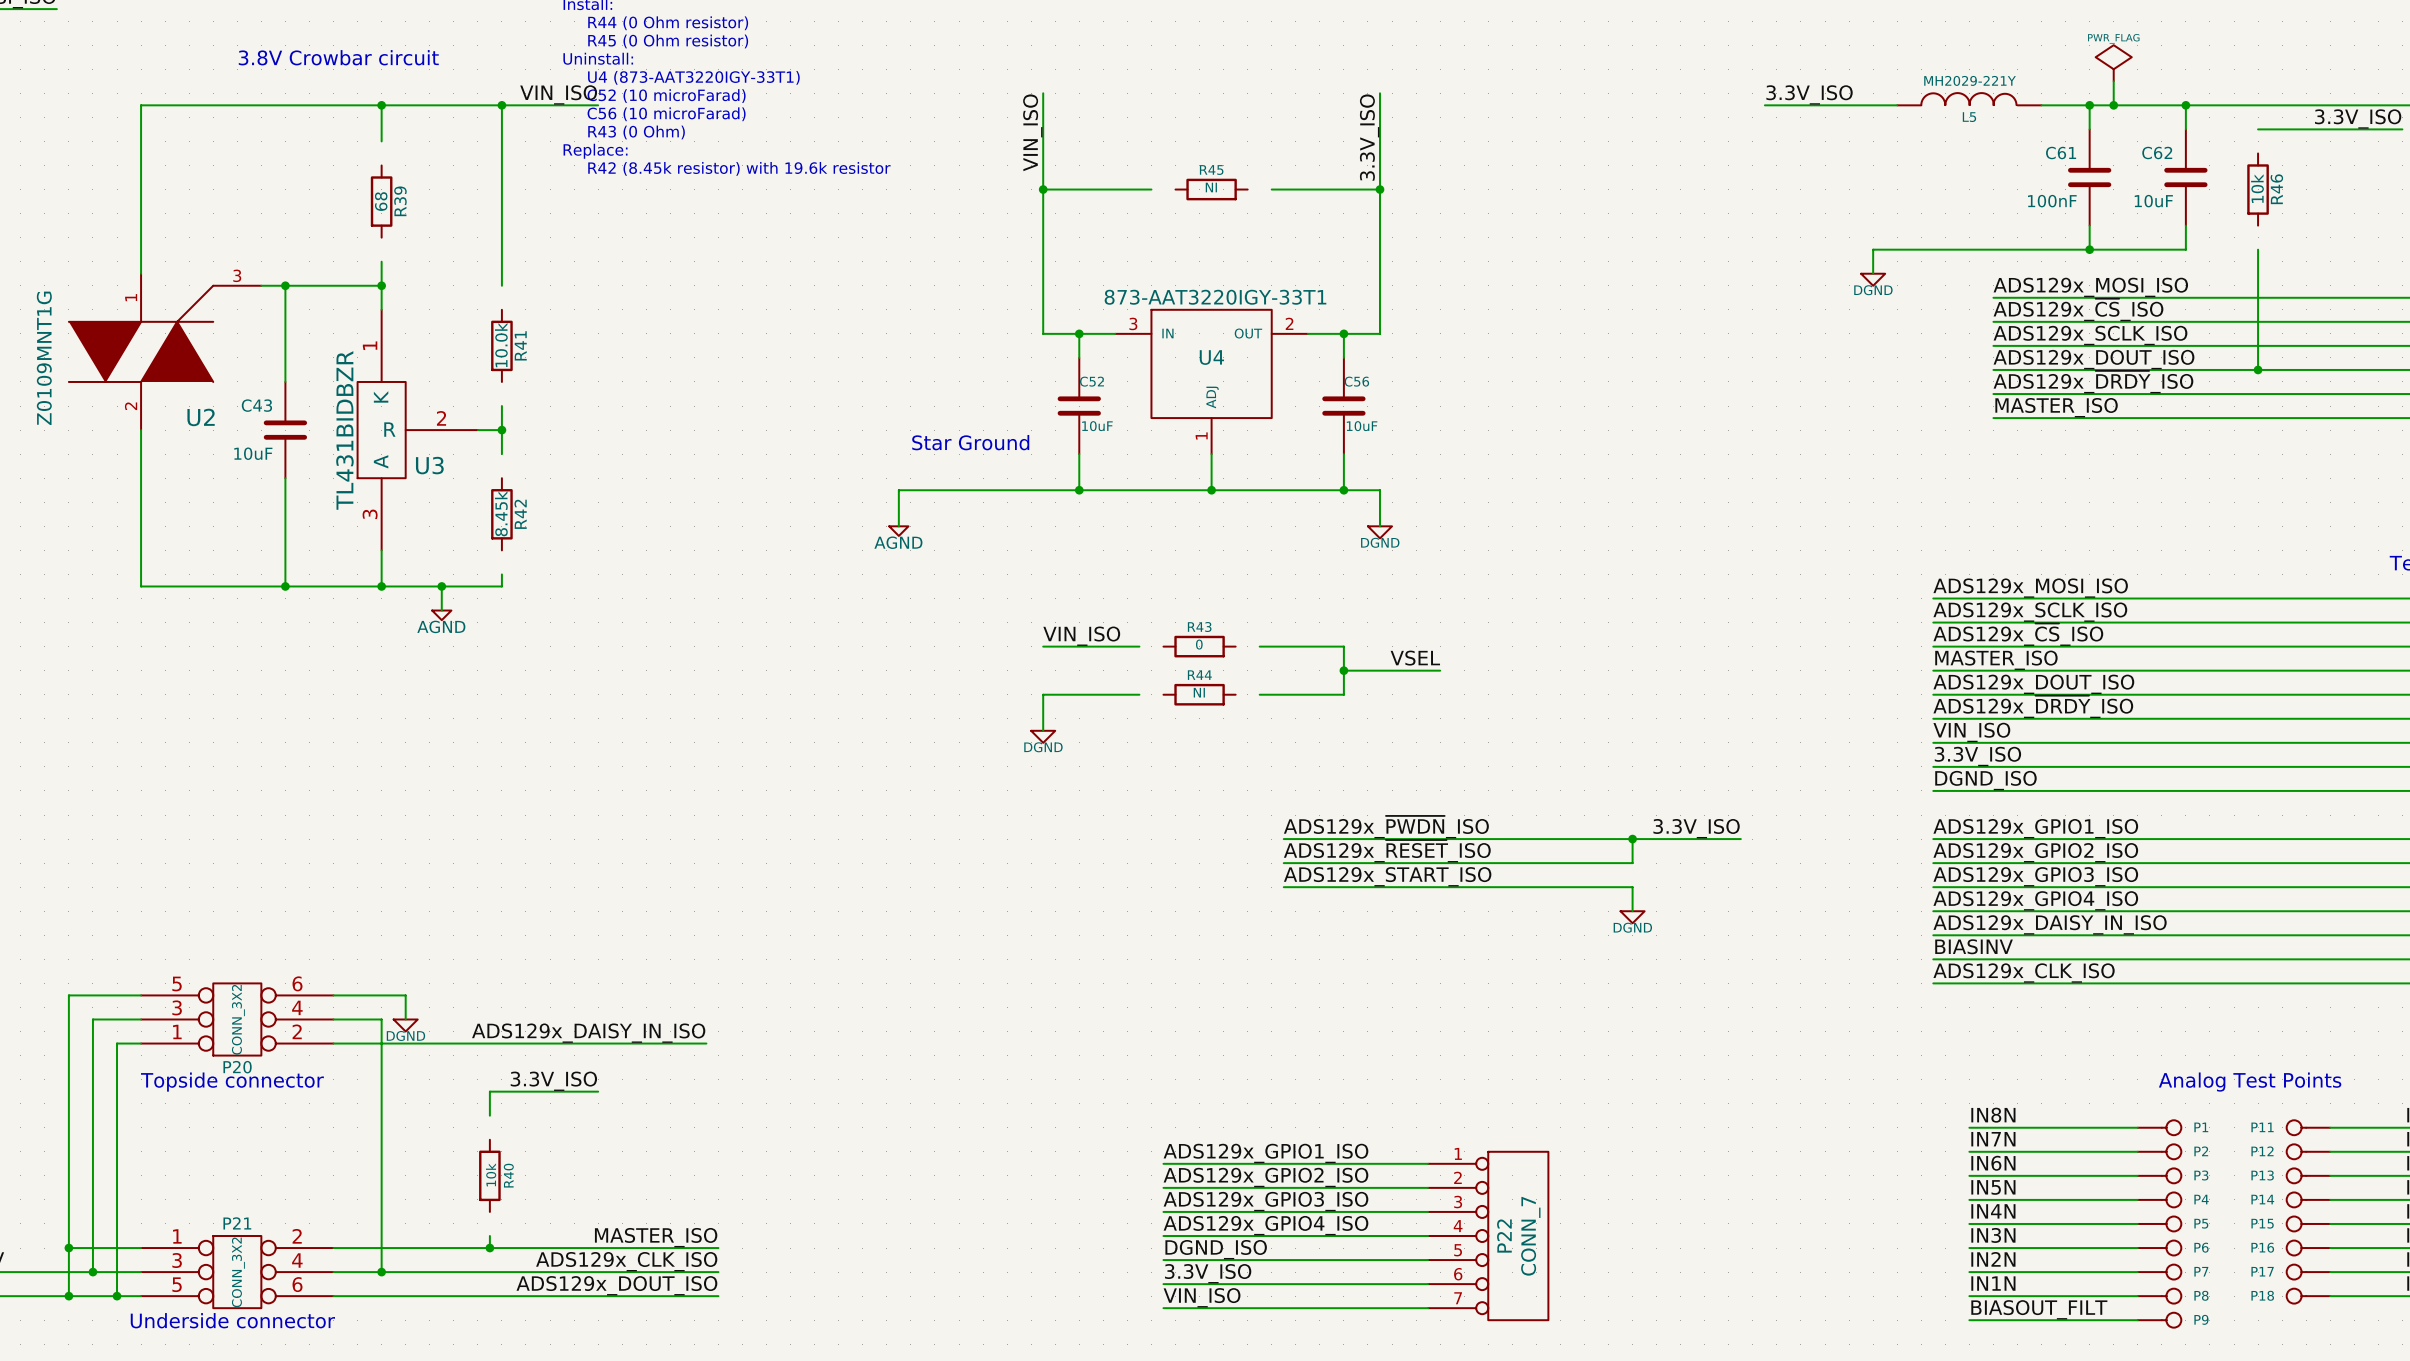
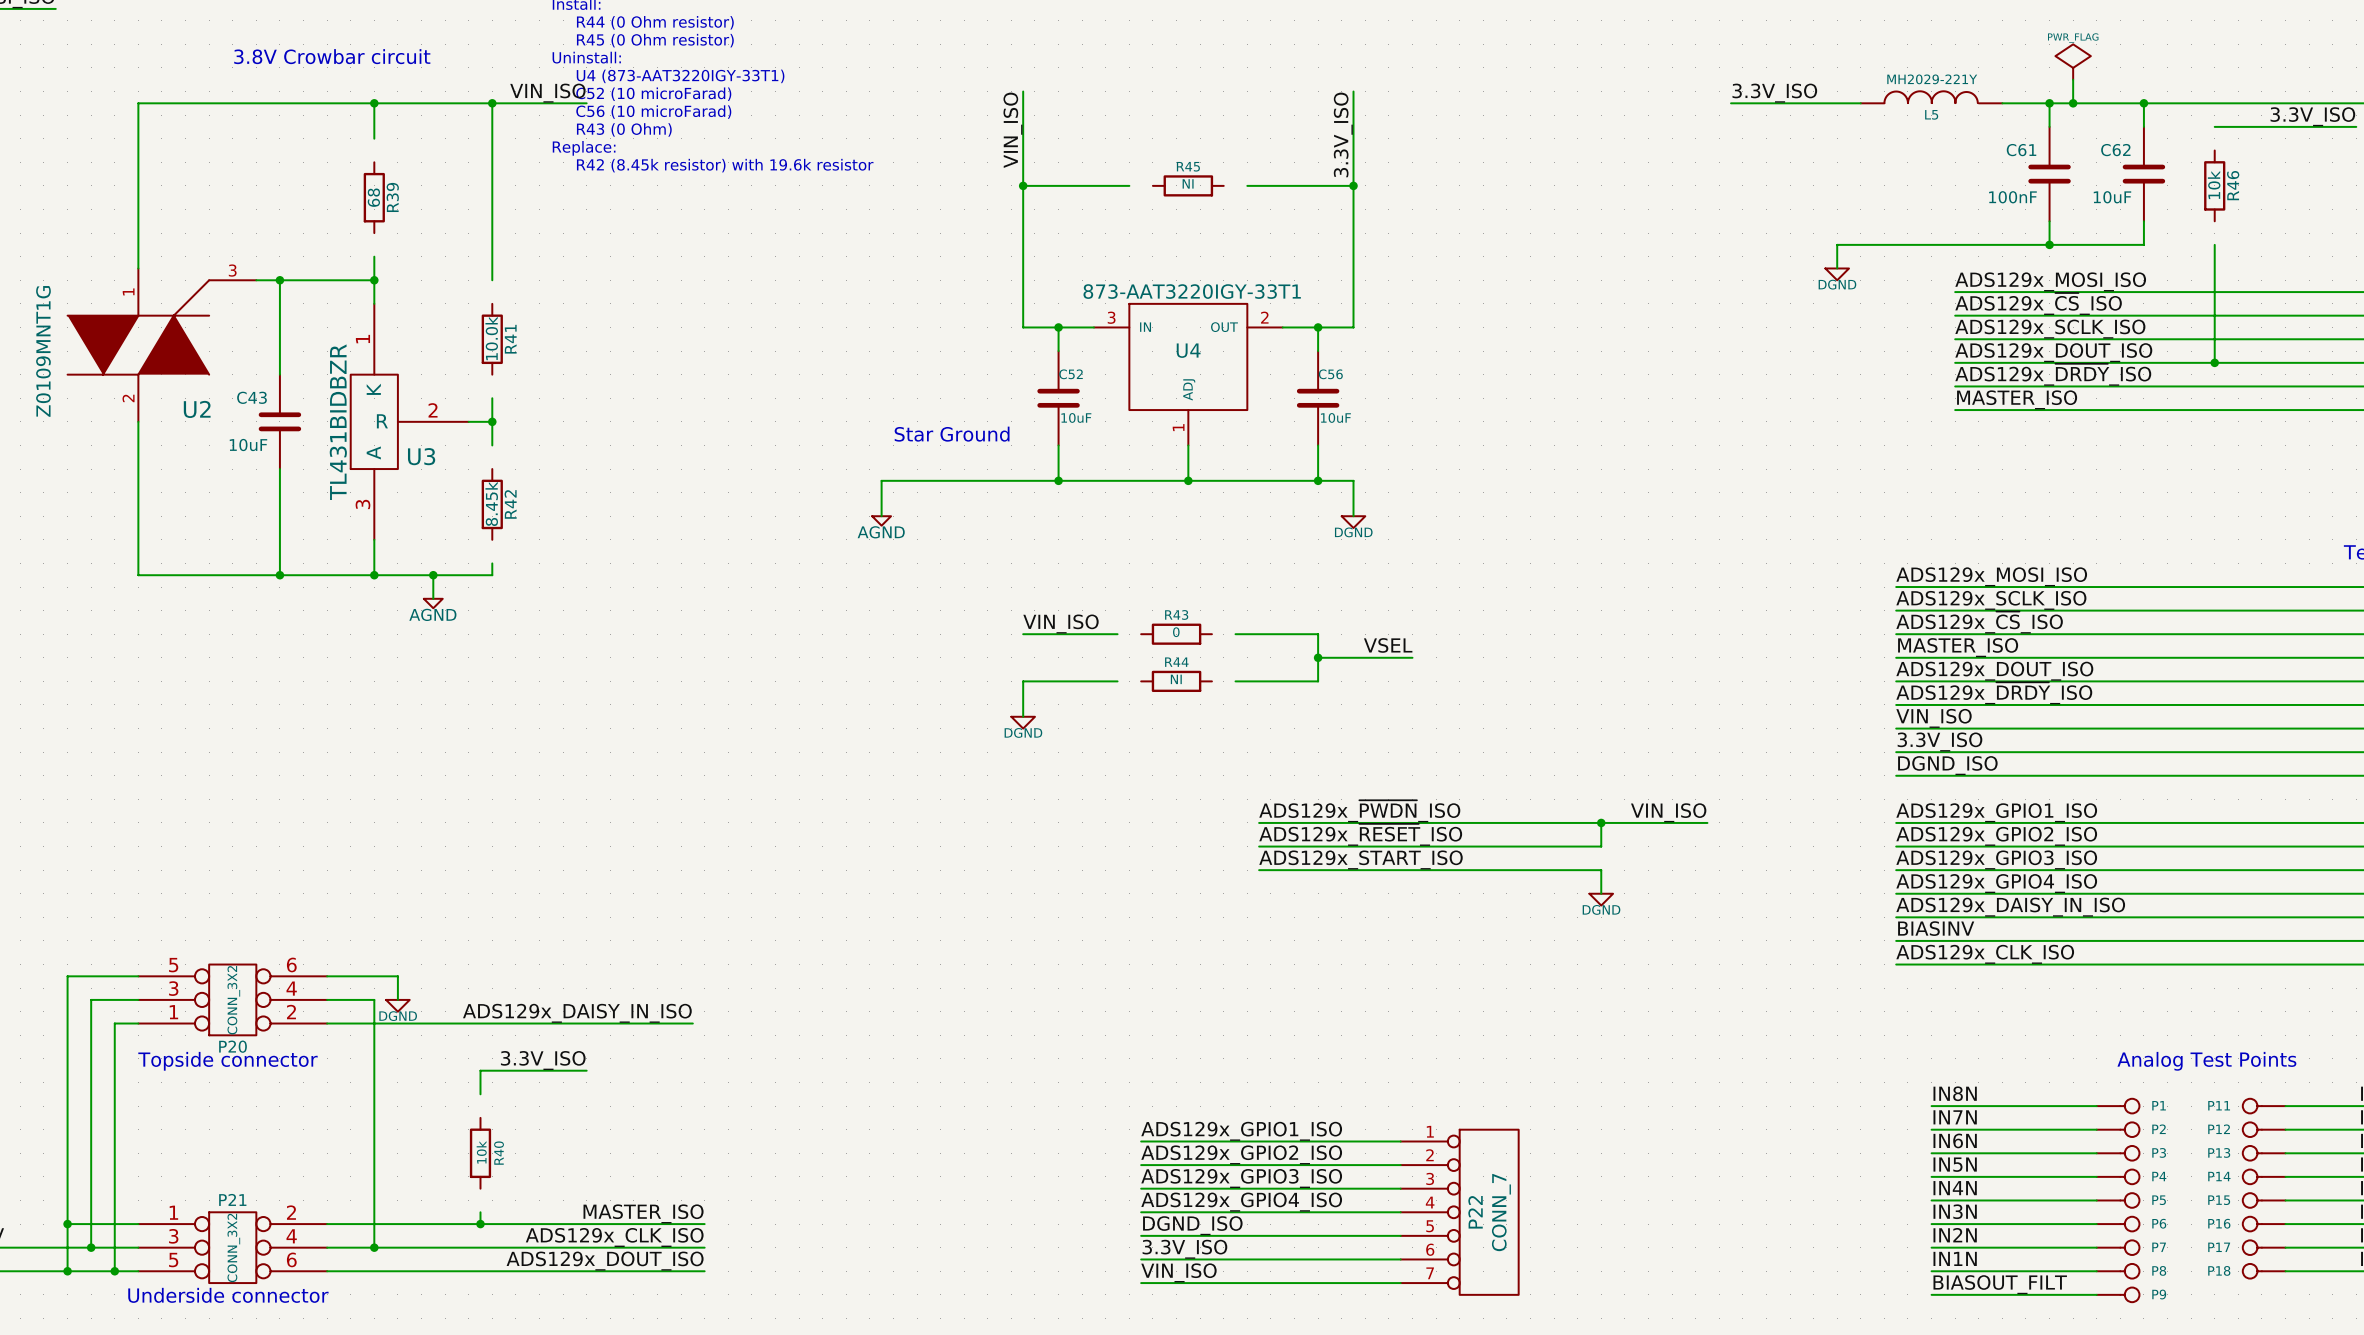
label: 3.3V_ISO (1696, 828) -> VIN_ISO (1668, 812)

